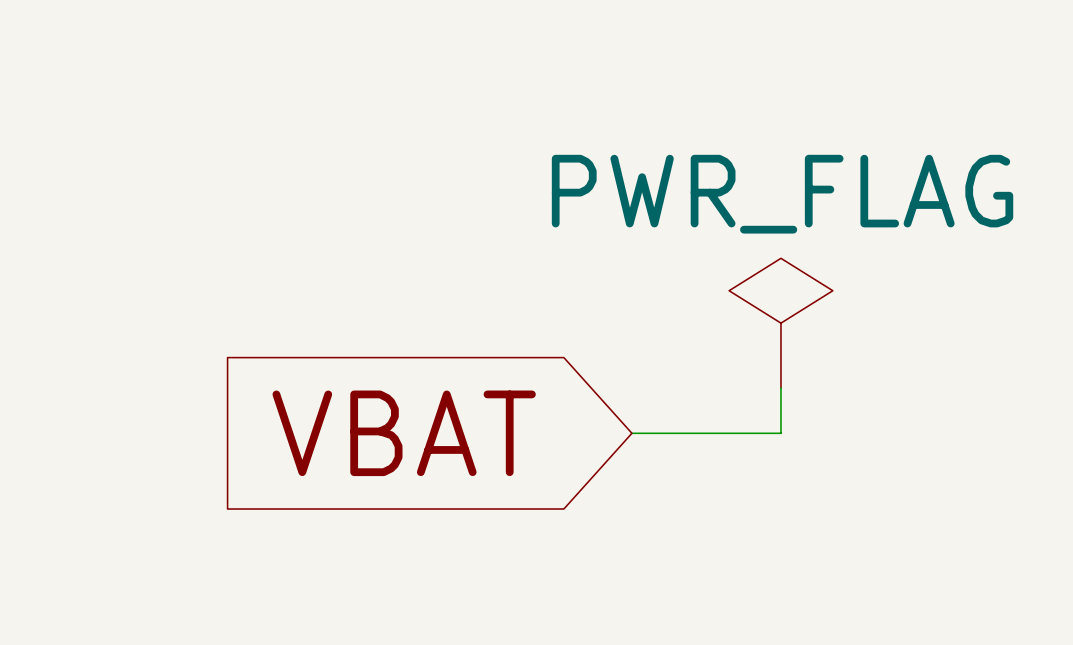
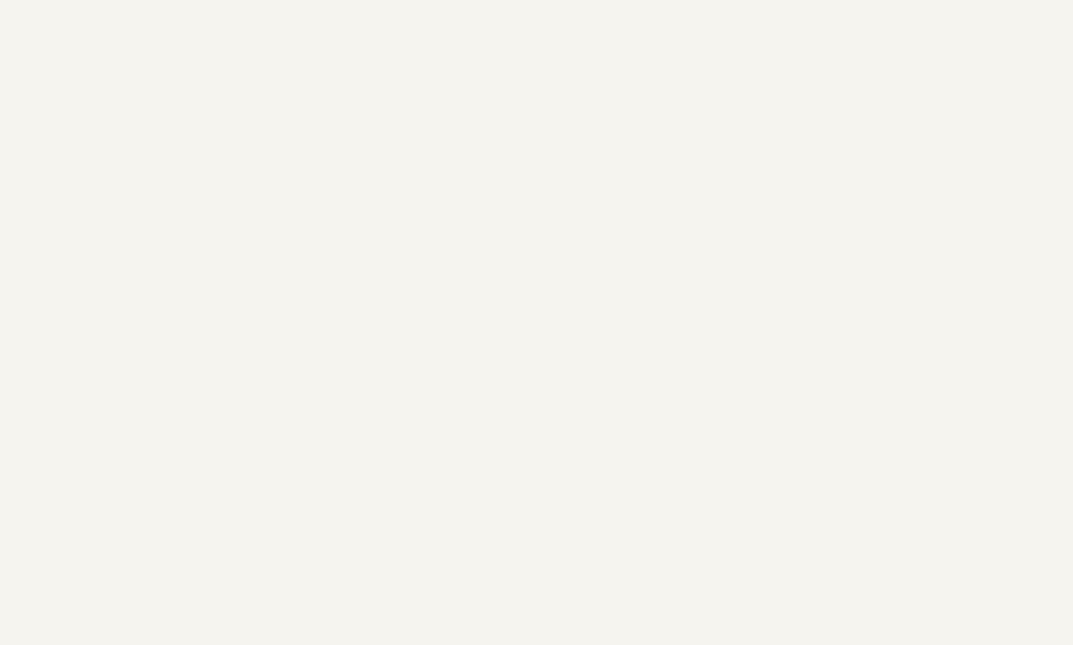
power symbol: PWR_FLAG (780, 323) -> none
wire: (780, 387) (780, 433) (631, 433) -> none
global label: VBAT (404, 433) -> none

